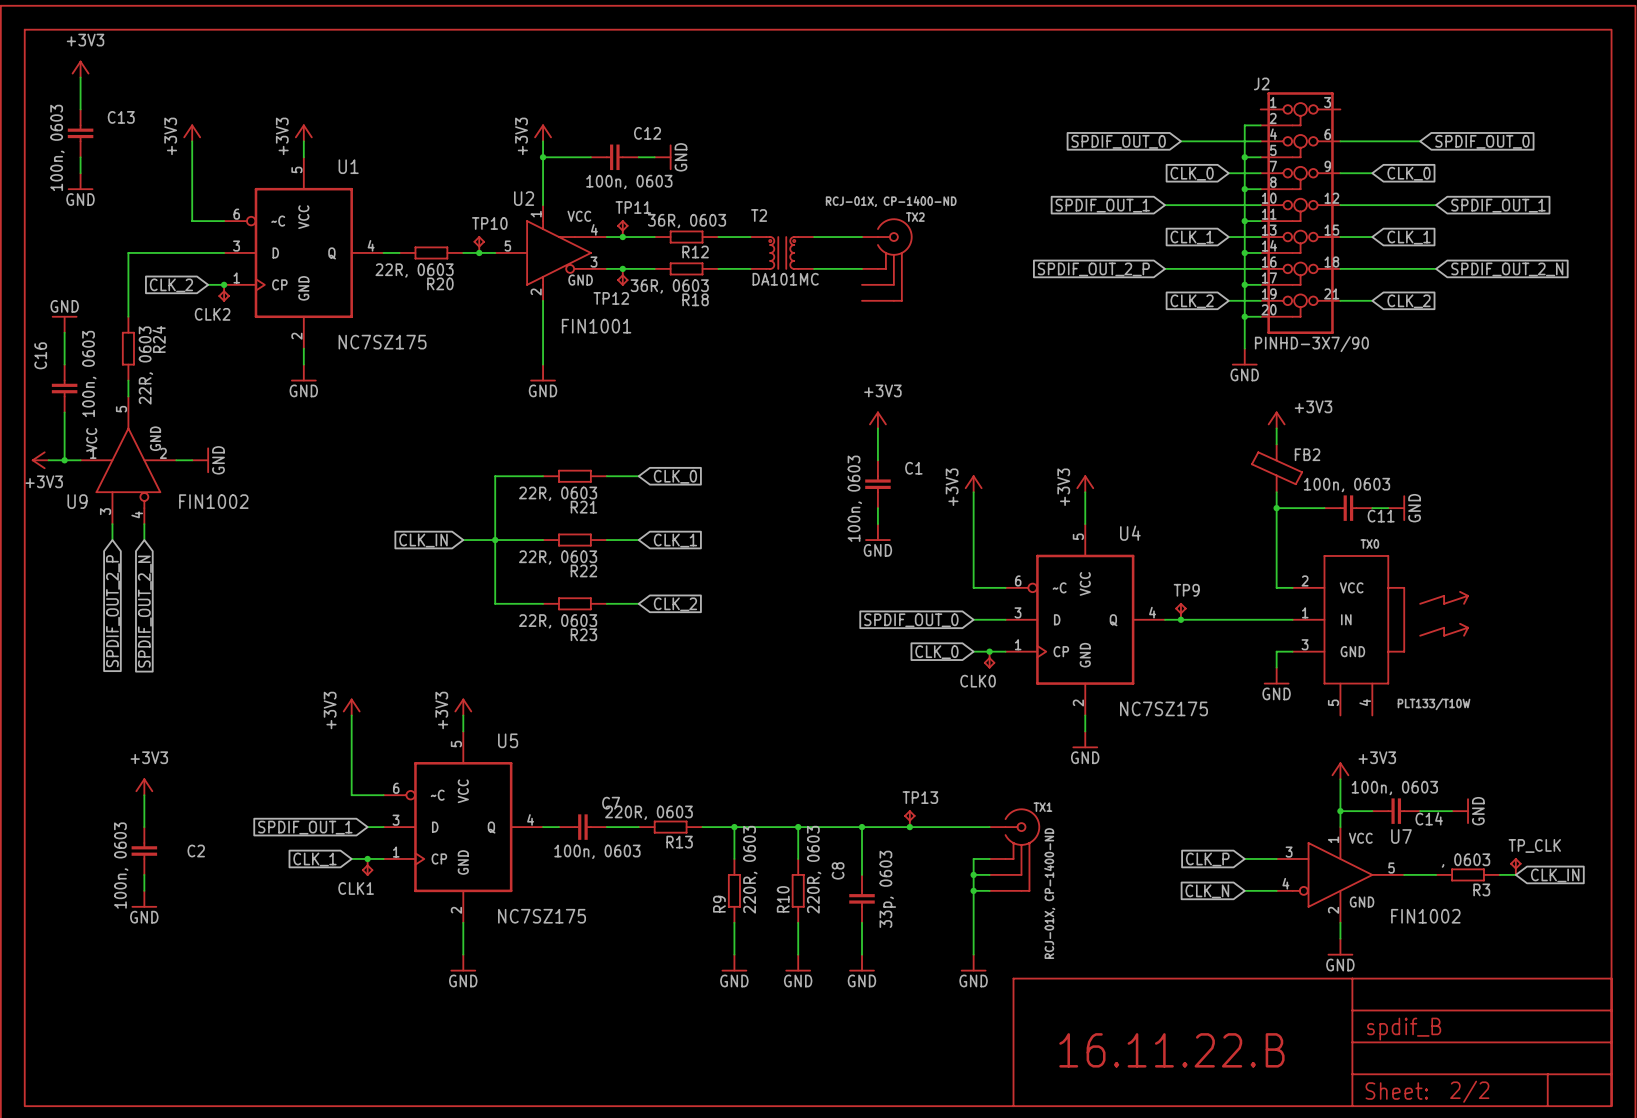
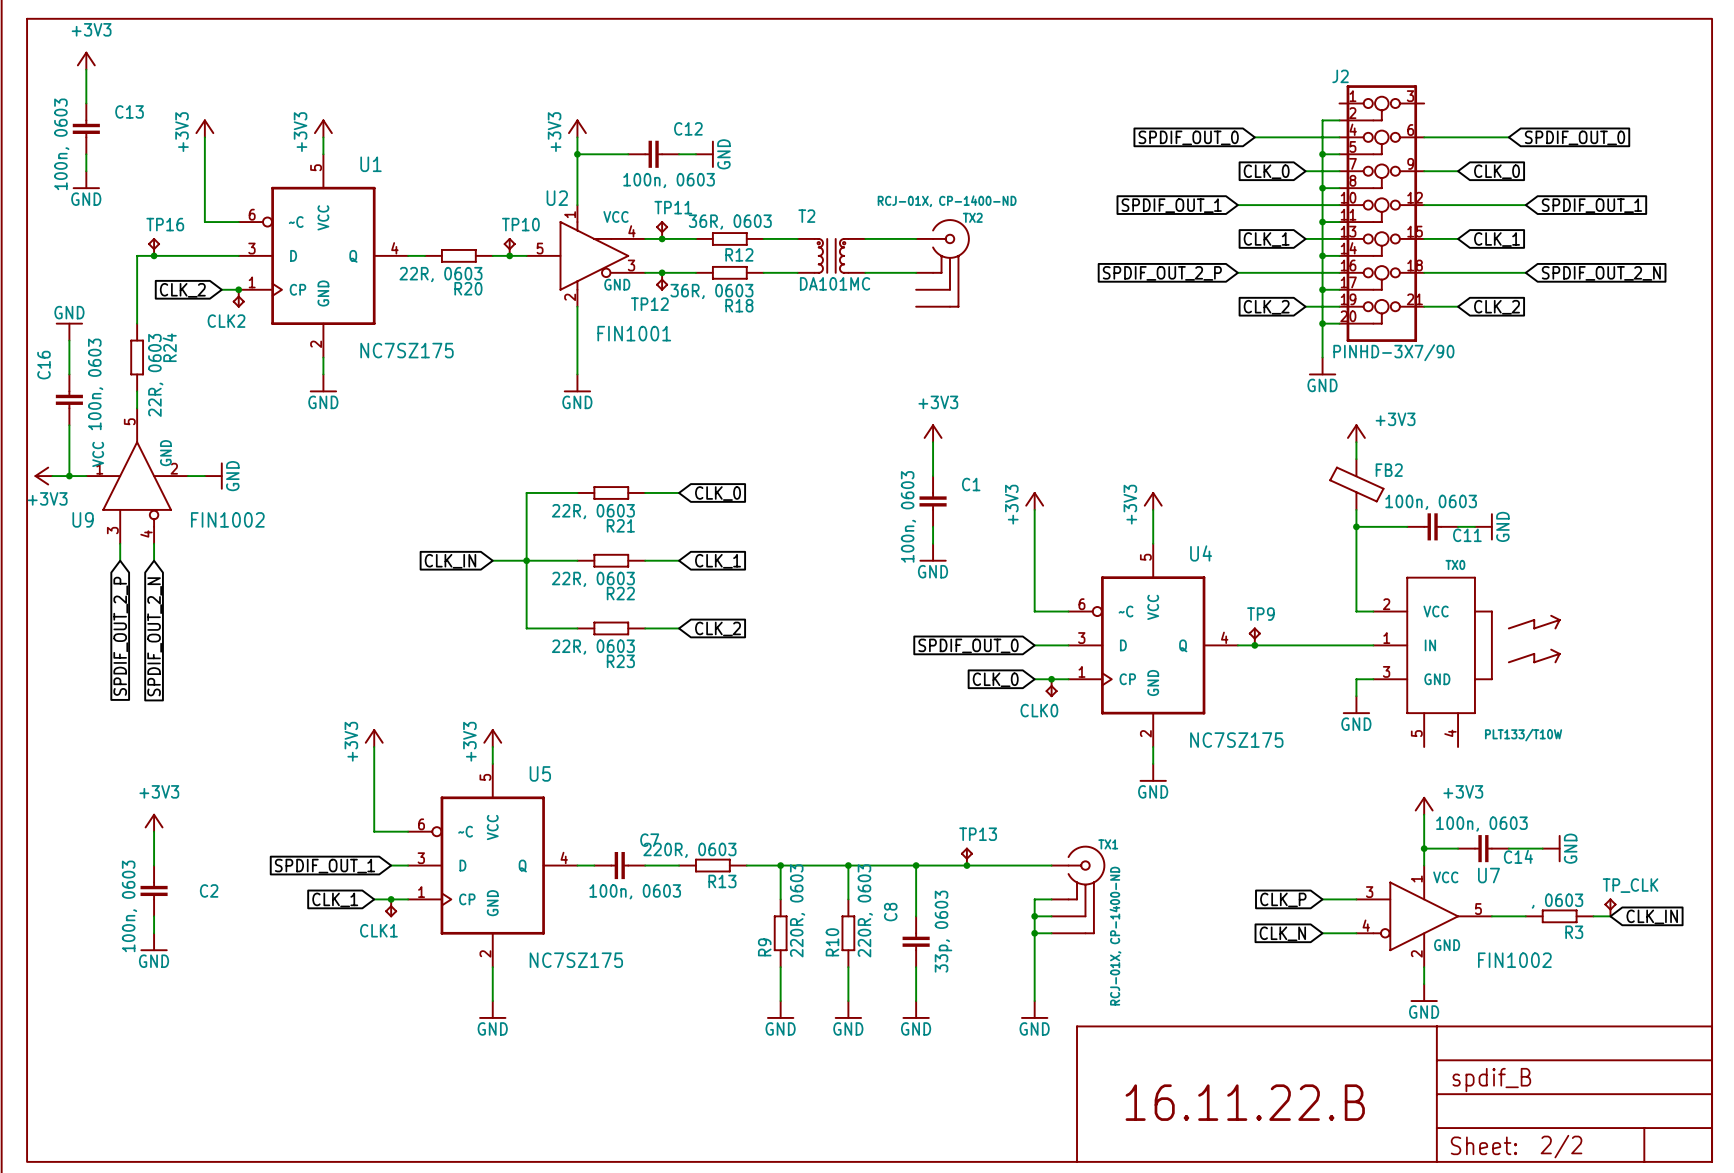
TP16: none -> (154, 247)
junction: none -> (154, 255)

